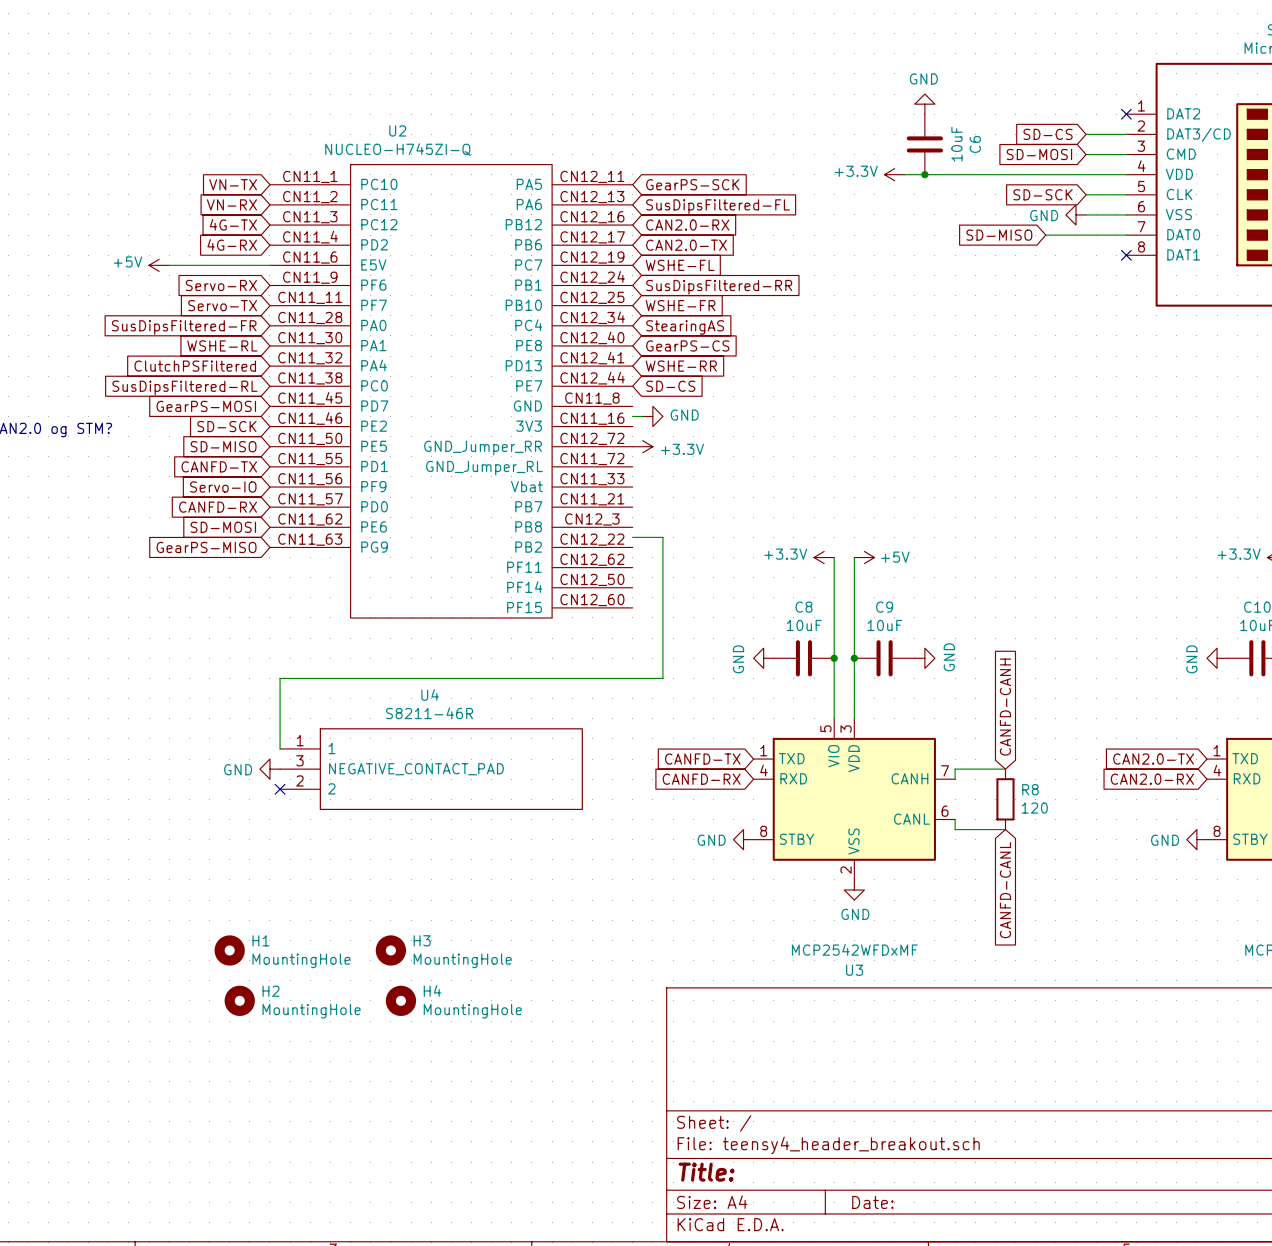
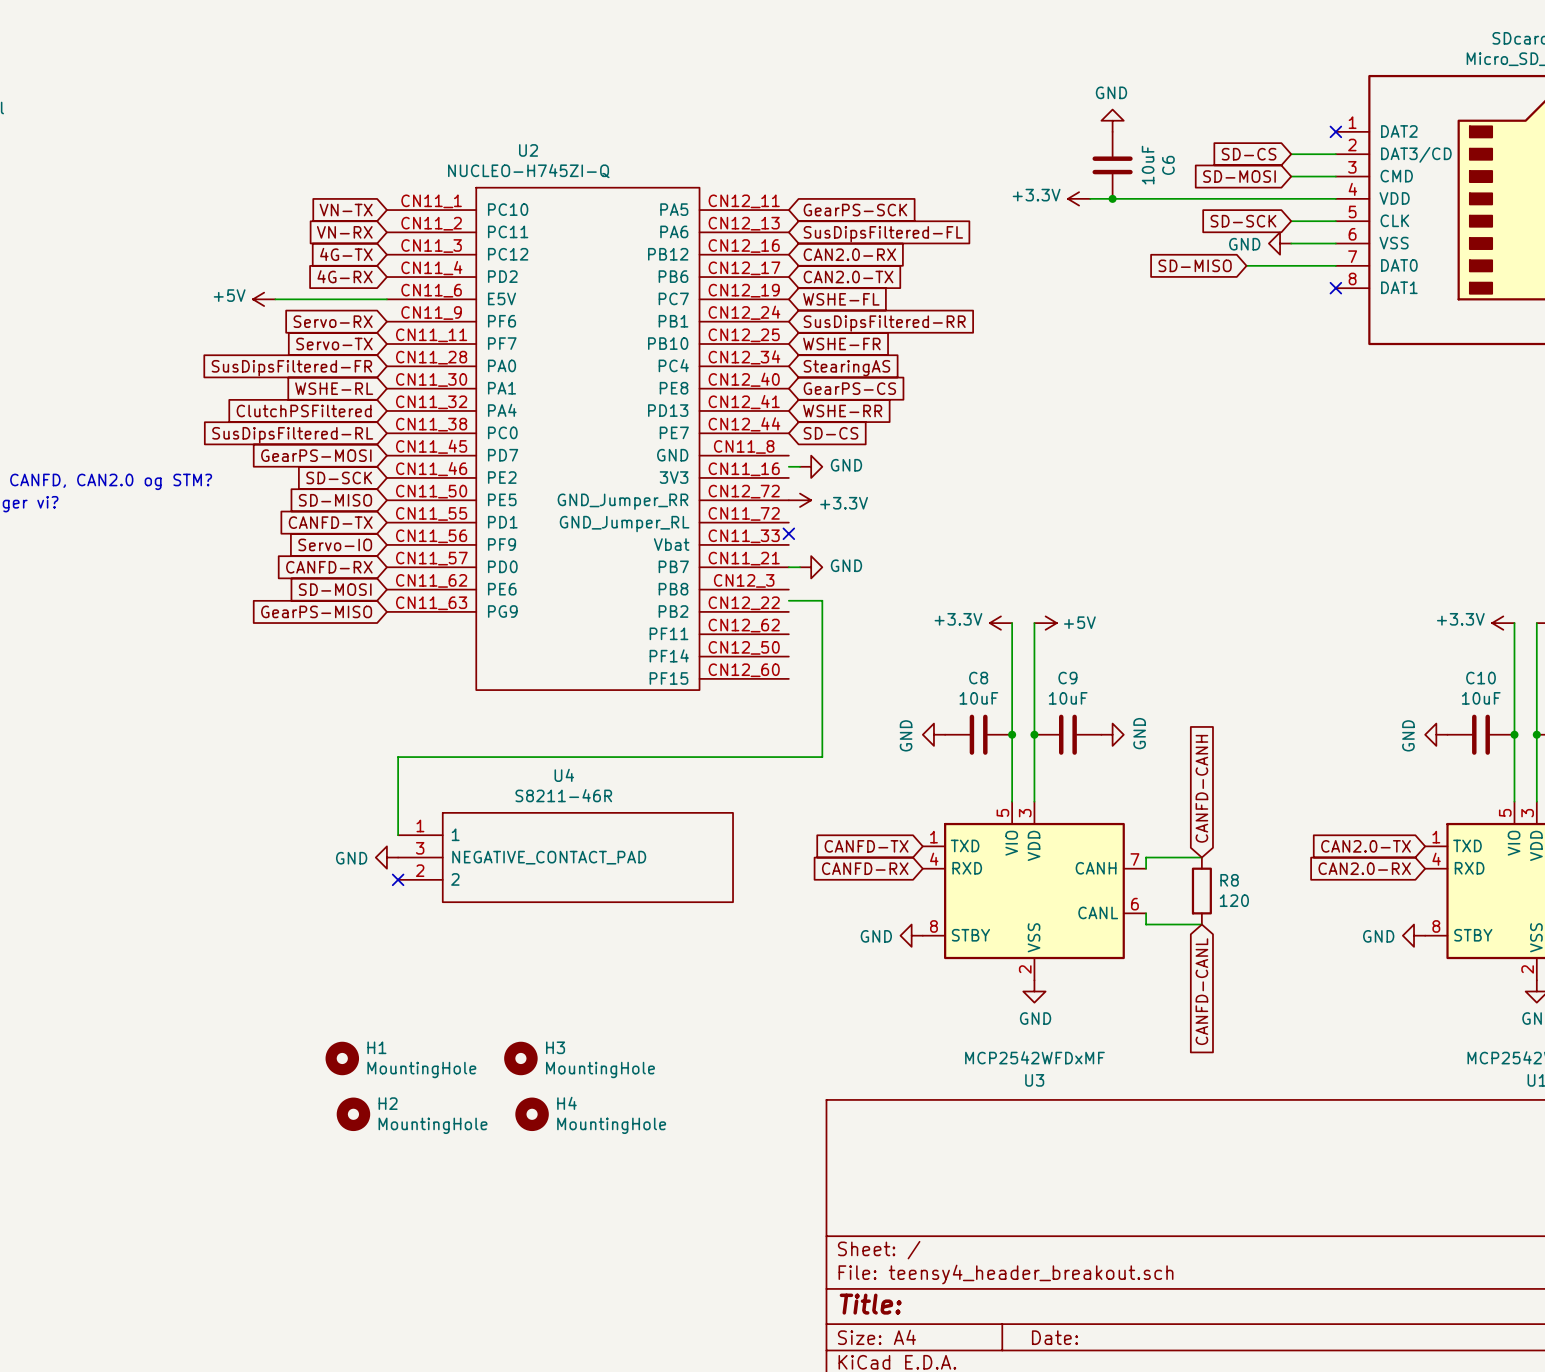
no-connect mark: none -> (788, 533)
wire: none -> (788, 567) (800, 567)
power symbol: none -> GND (811, 567)

